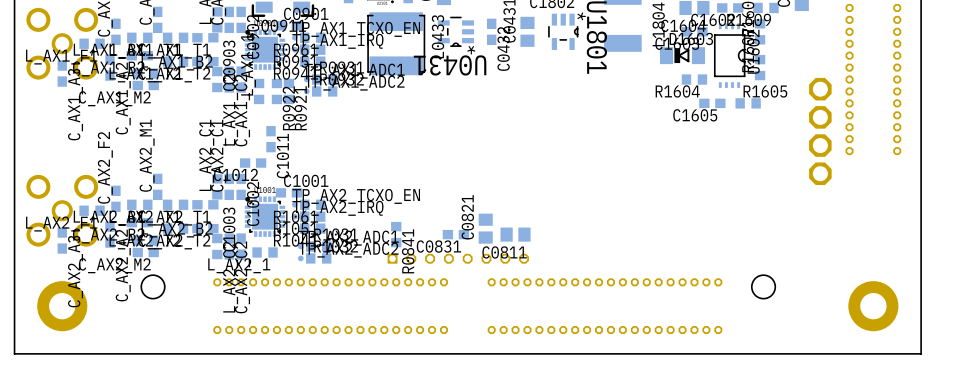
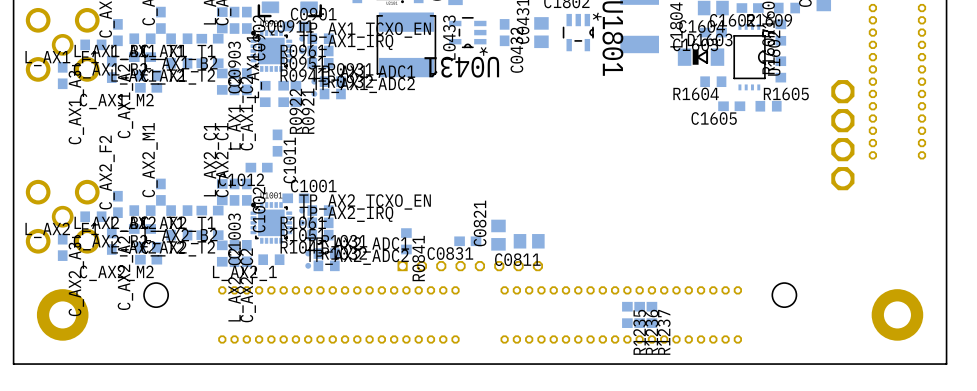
R1235: none -> (627, 314)
R1236: none -> (639, 314)
R1237: none -> (651, 314)

